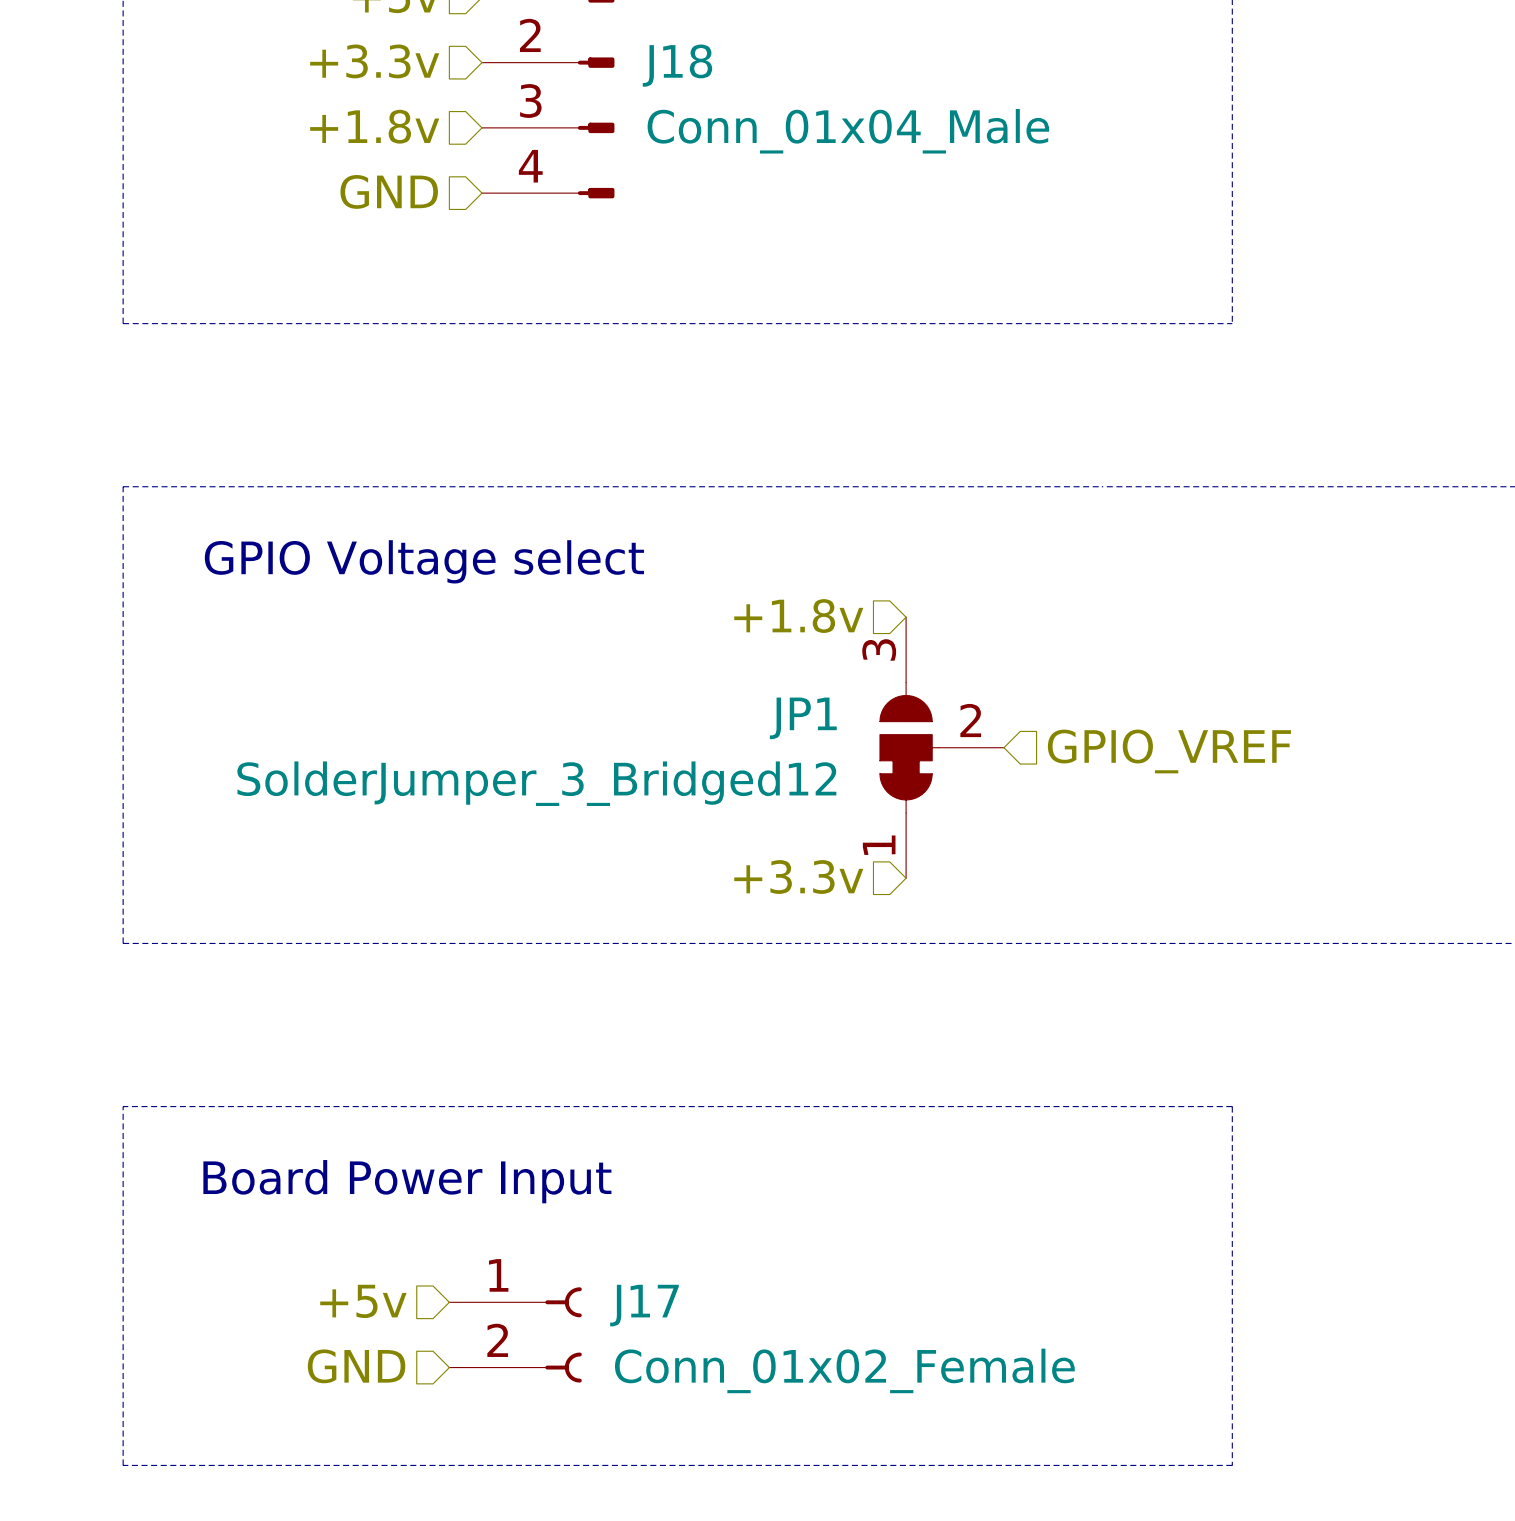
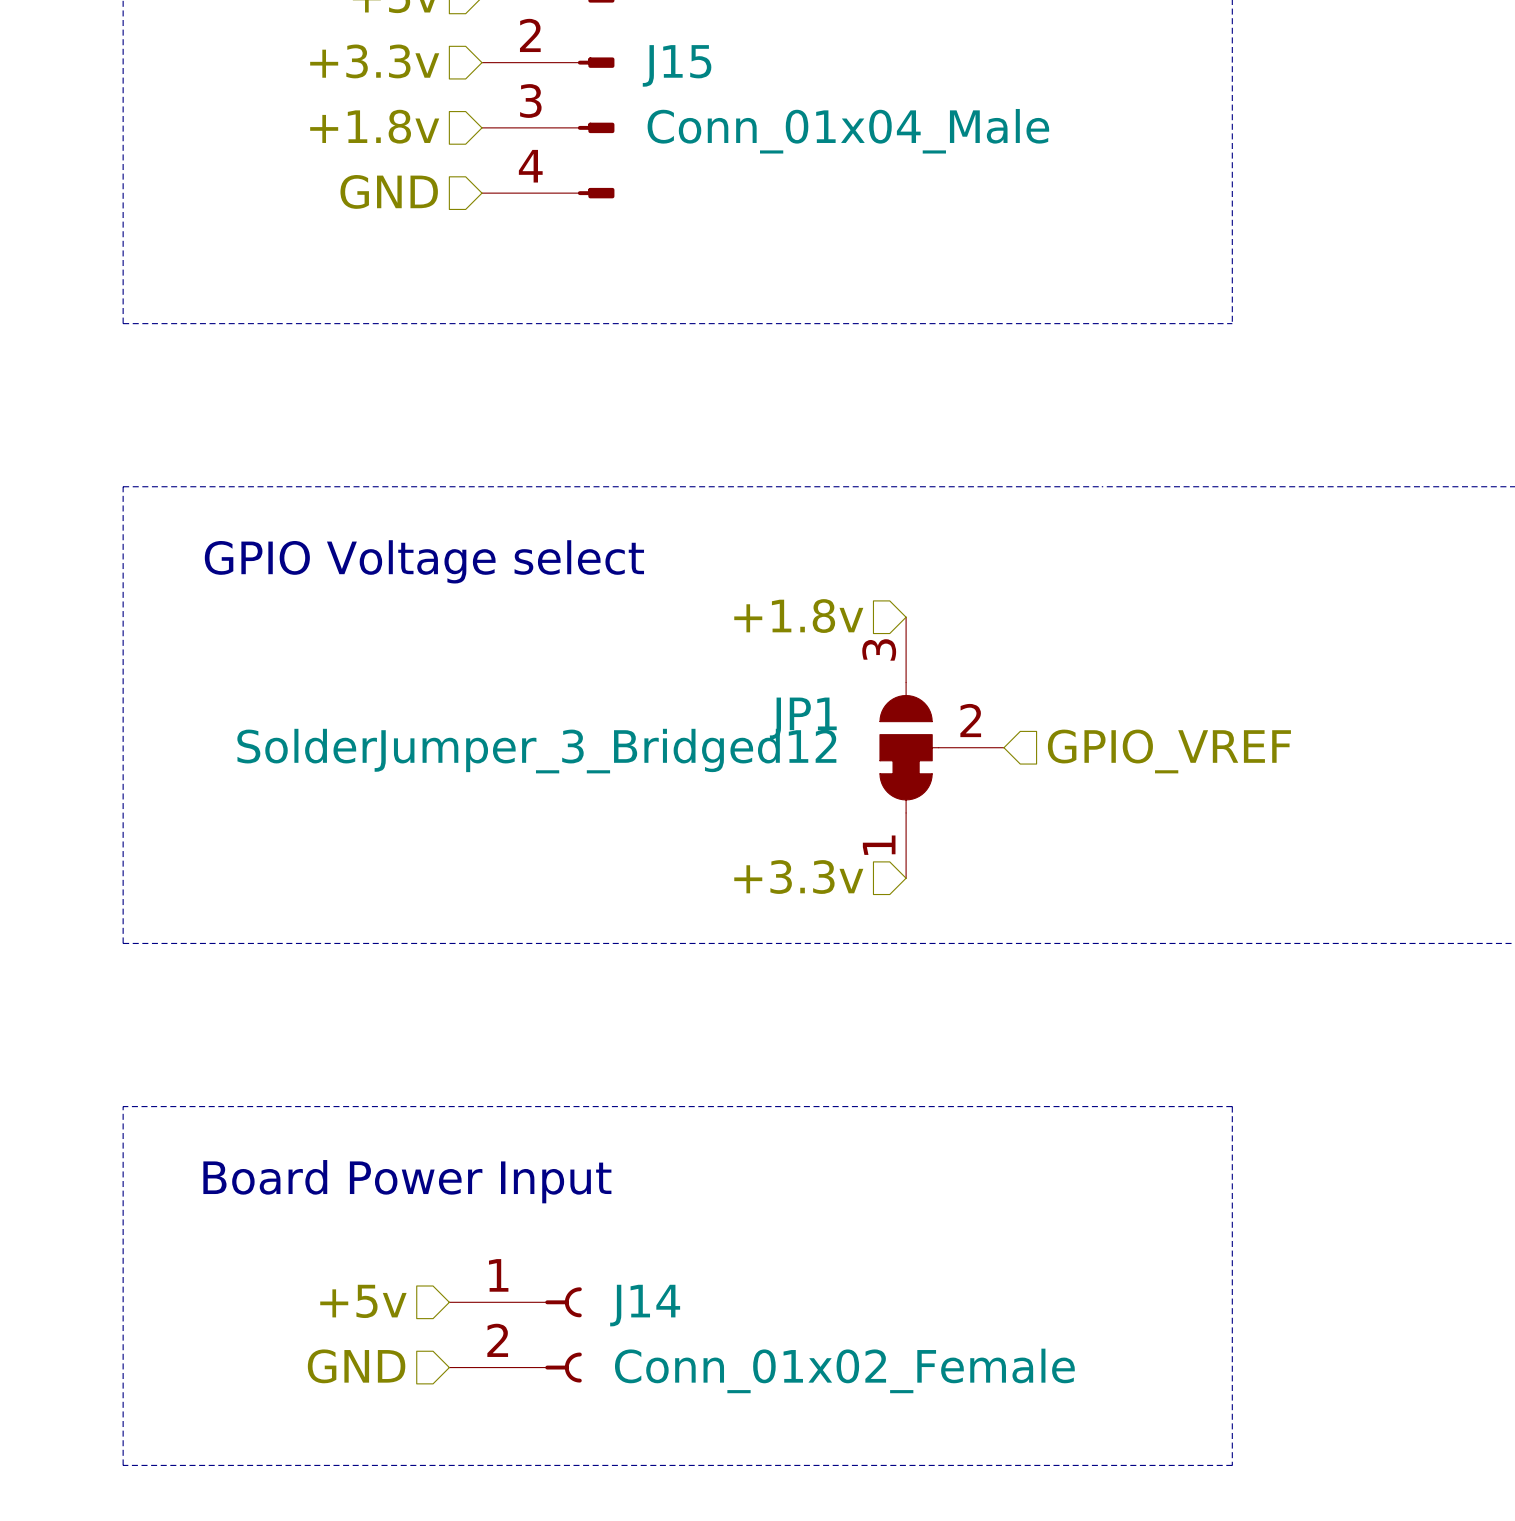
J18 name: J18 (677, 65) -> J15 (677, 65)
JP1 value position: SolderJumper_3_Bridged12 (536, 783) -> SolderJumper_3_Bridged12 (536, 751)
J17 name: J17 (644, 1305) -> J14 (645, 1305)

